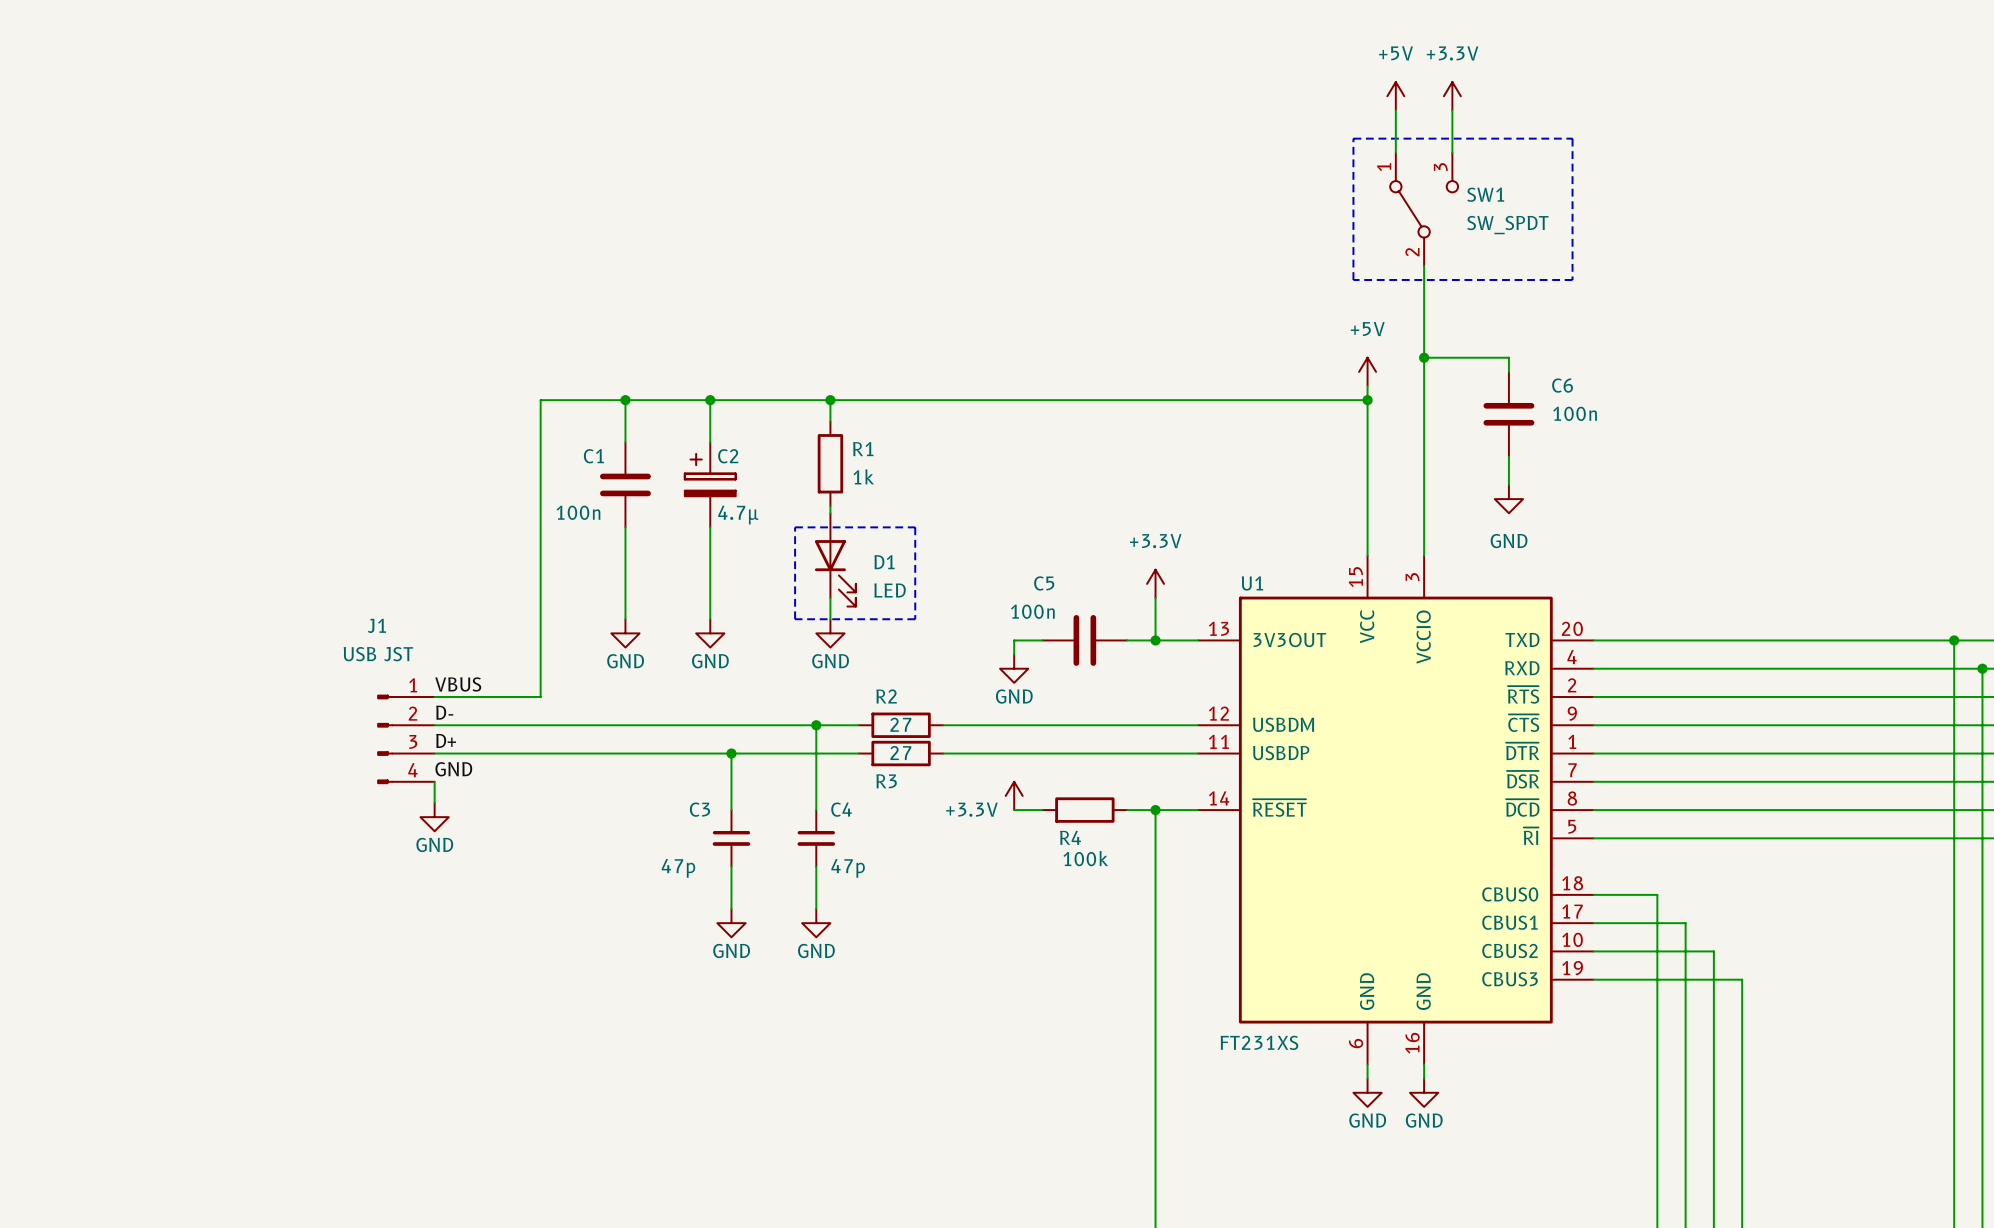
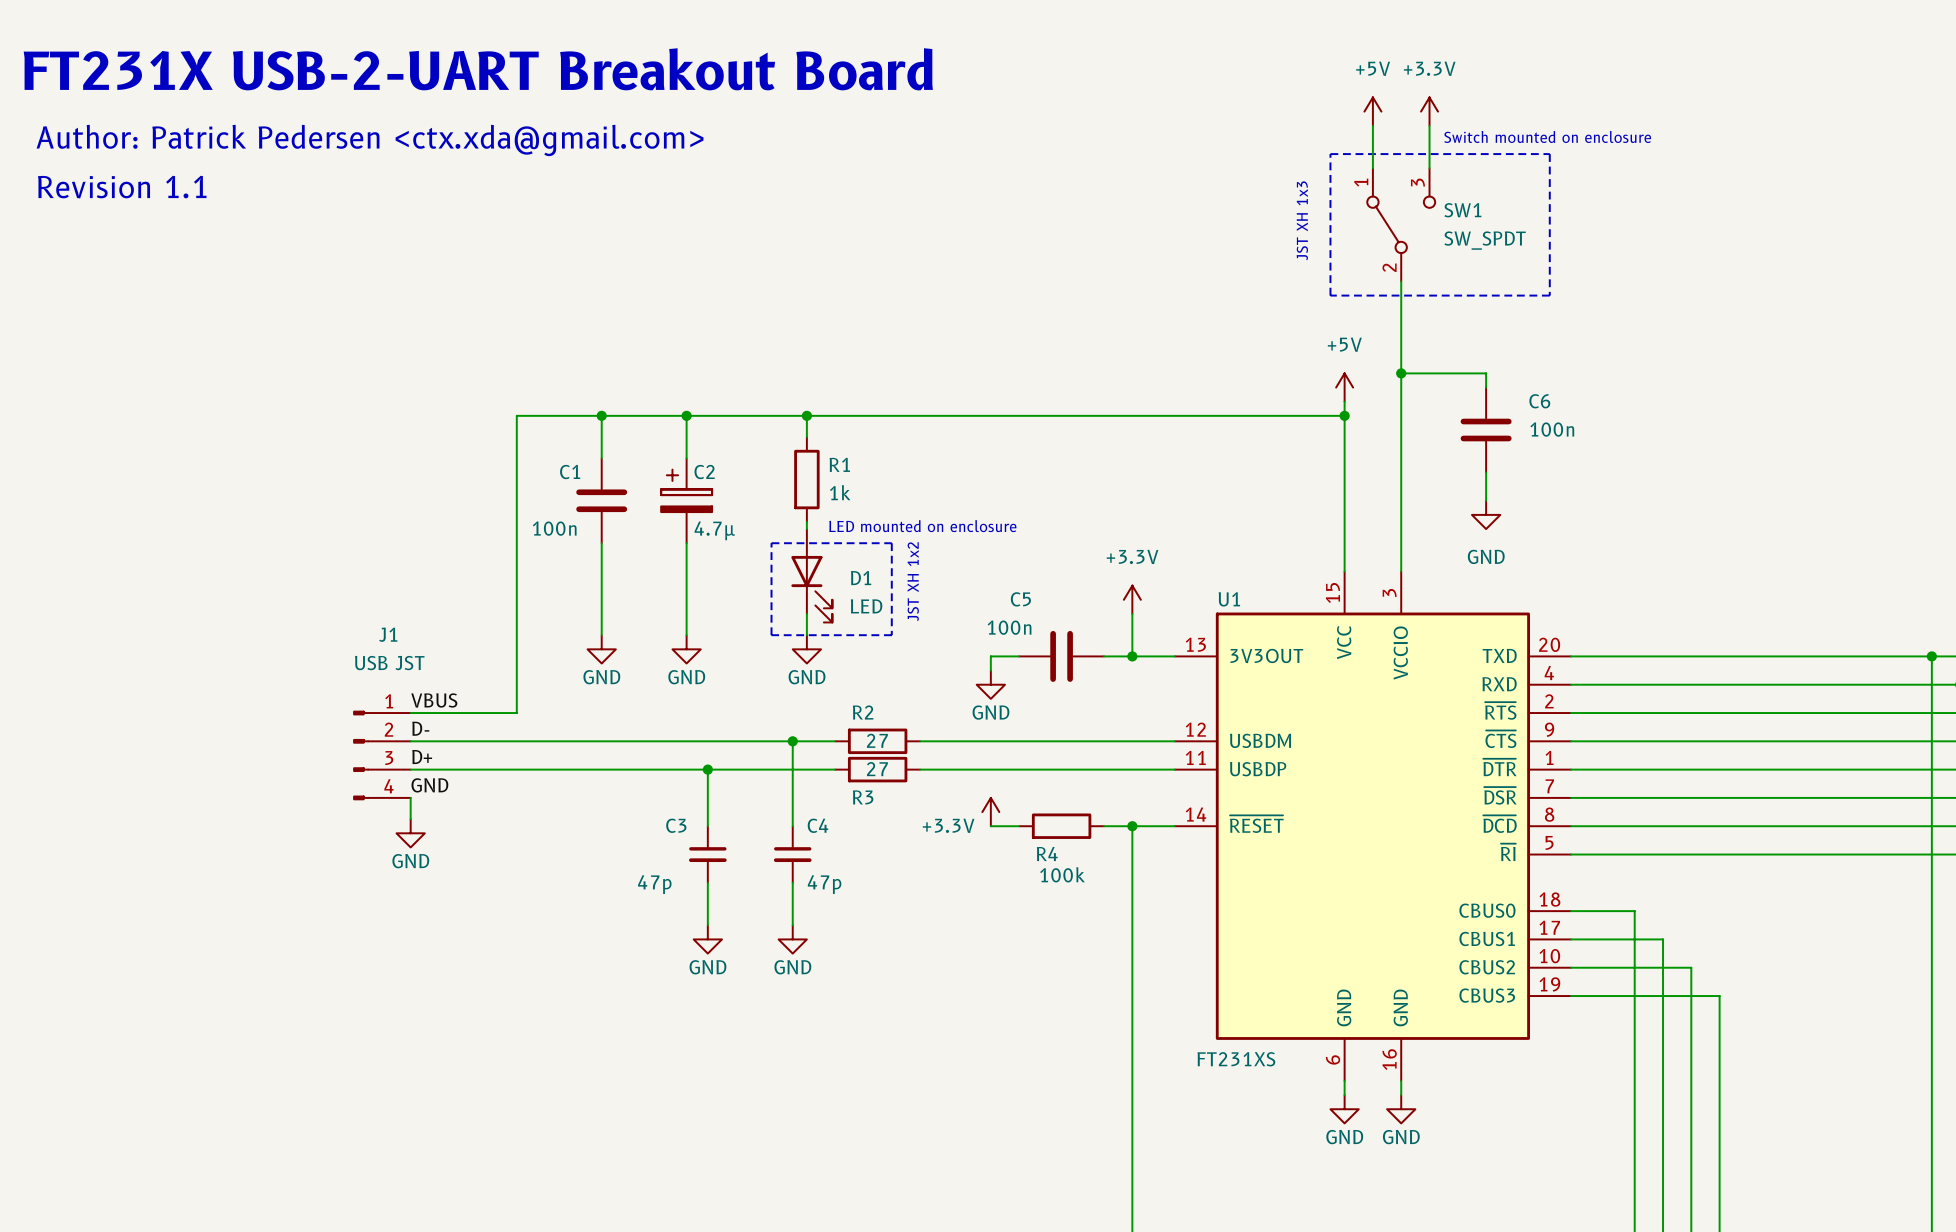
text: none -> FT231X USB-2-UART Breakout Board (478, 69)
text: none -> Switch mounted on enclosure (1547, 136)
text: none -> Author: Patrick Pedersen <ctx.xda@gmail.com> (370, 140)
text: none -> Revision 1.1 (122, 187)
text: none -> JST XH 1x3 (1302, 220)
text: none -> LED mounted on enclosure (922, 526)
text: none -> JST XH 1x2 (913, 581)
J1 name position: J1 (376, 625) -> J1 (388, 634)
J1 value position: USB JST (378, 654) -> USB JST (389, 663)

